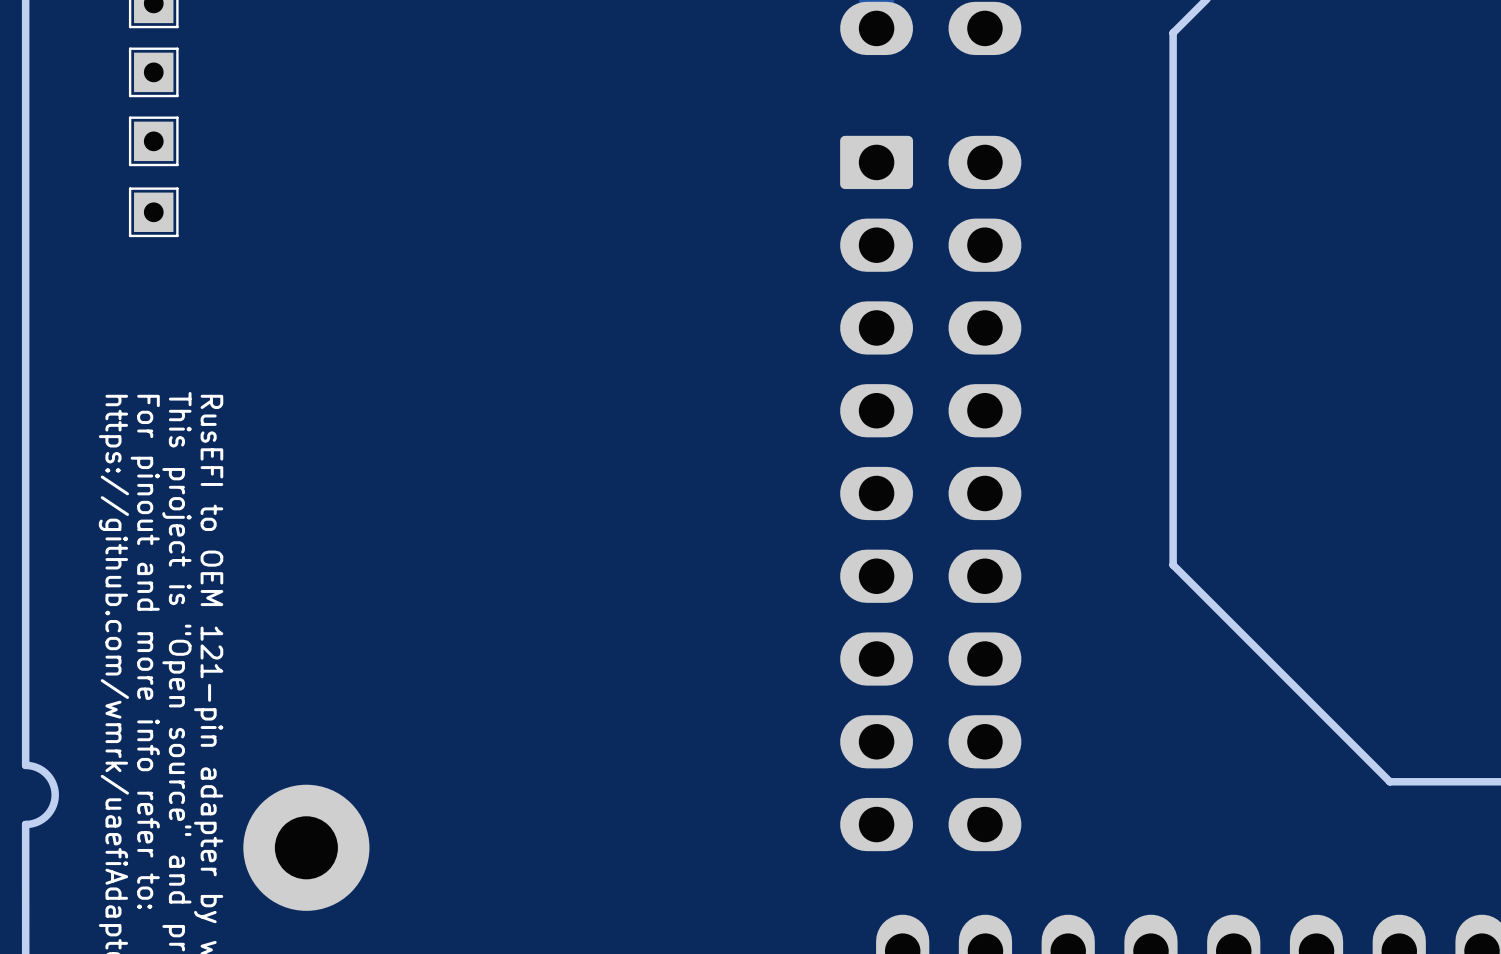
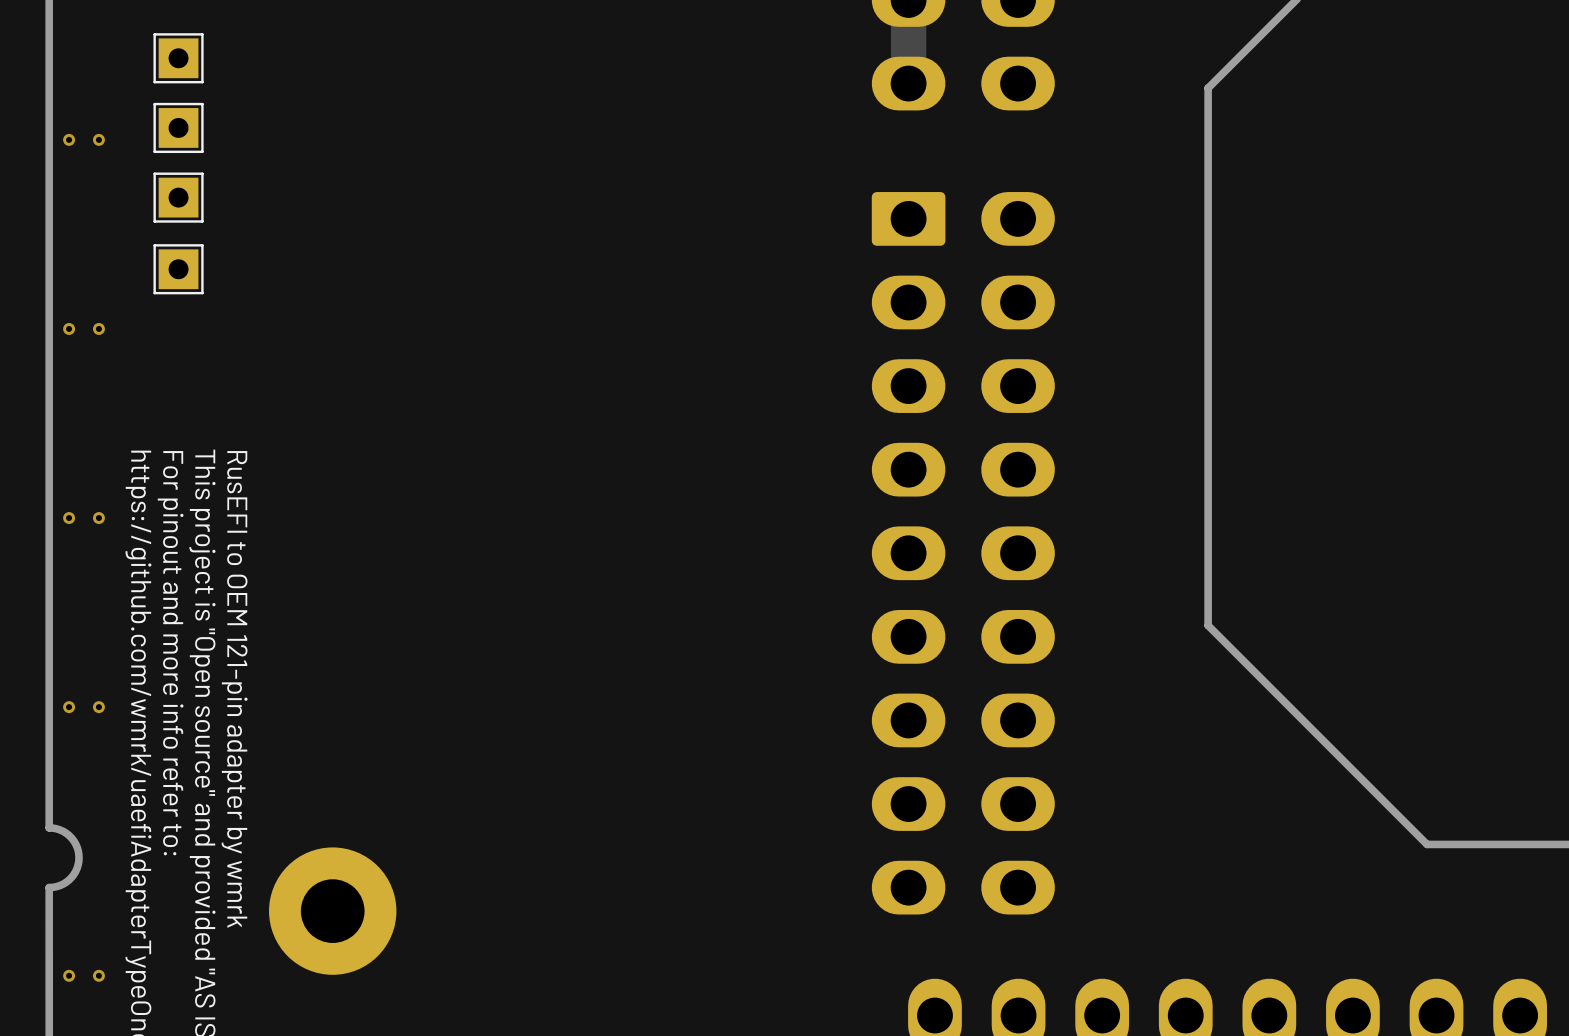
via: none -> (69, 139)
via: none -> (98, 139)
via: none -> (69, 328)
via: none -> (98, 328)
via: none -> (69, 518)
via: none -> (98, 518)
via: none -> (69, 707)
via: none -> (98, 707)
via: none -> (69, 975)
via: none -> (98, 975)

